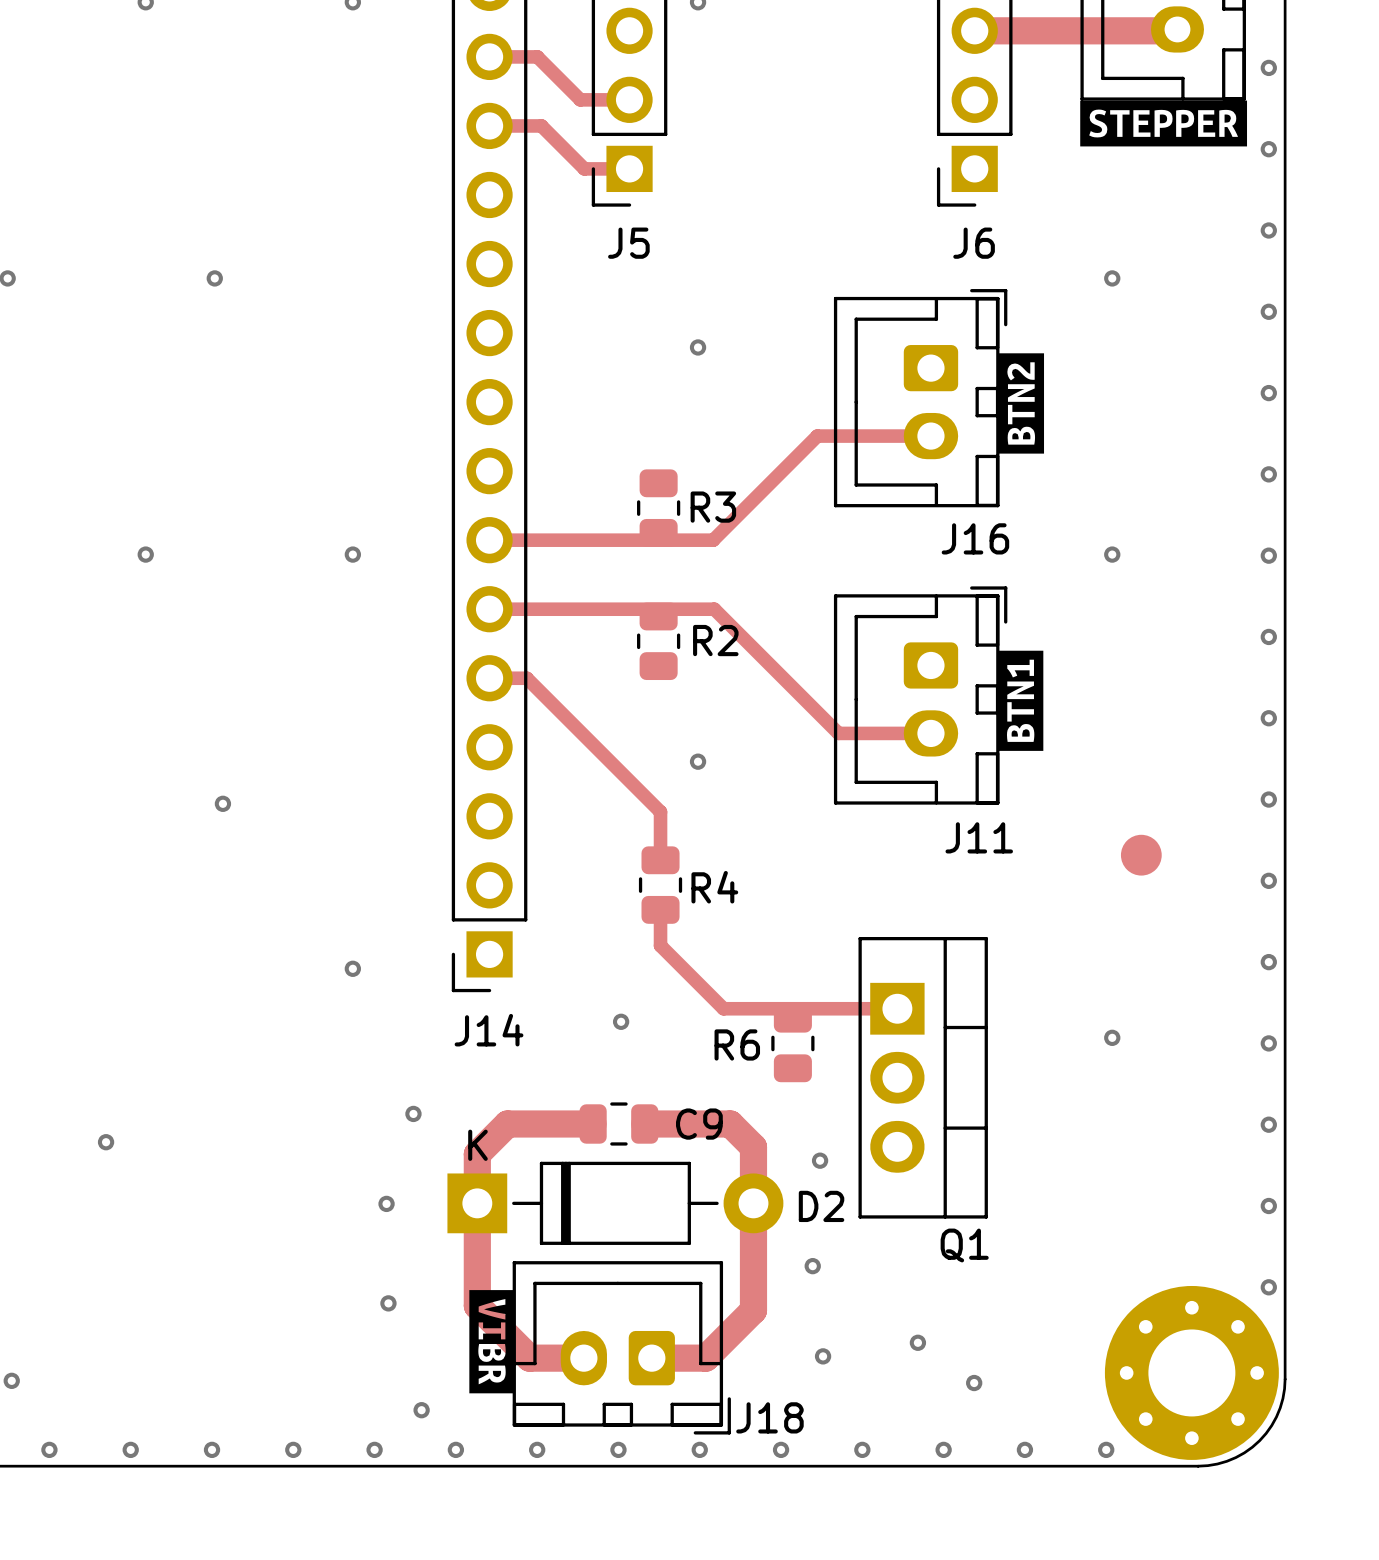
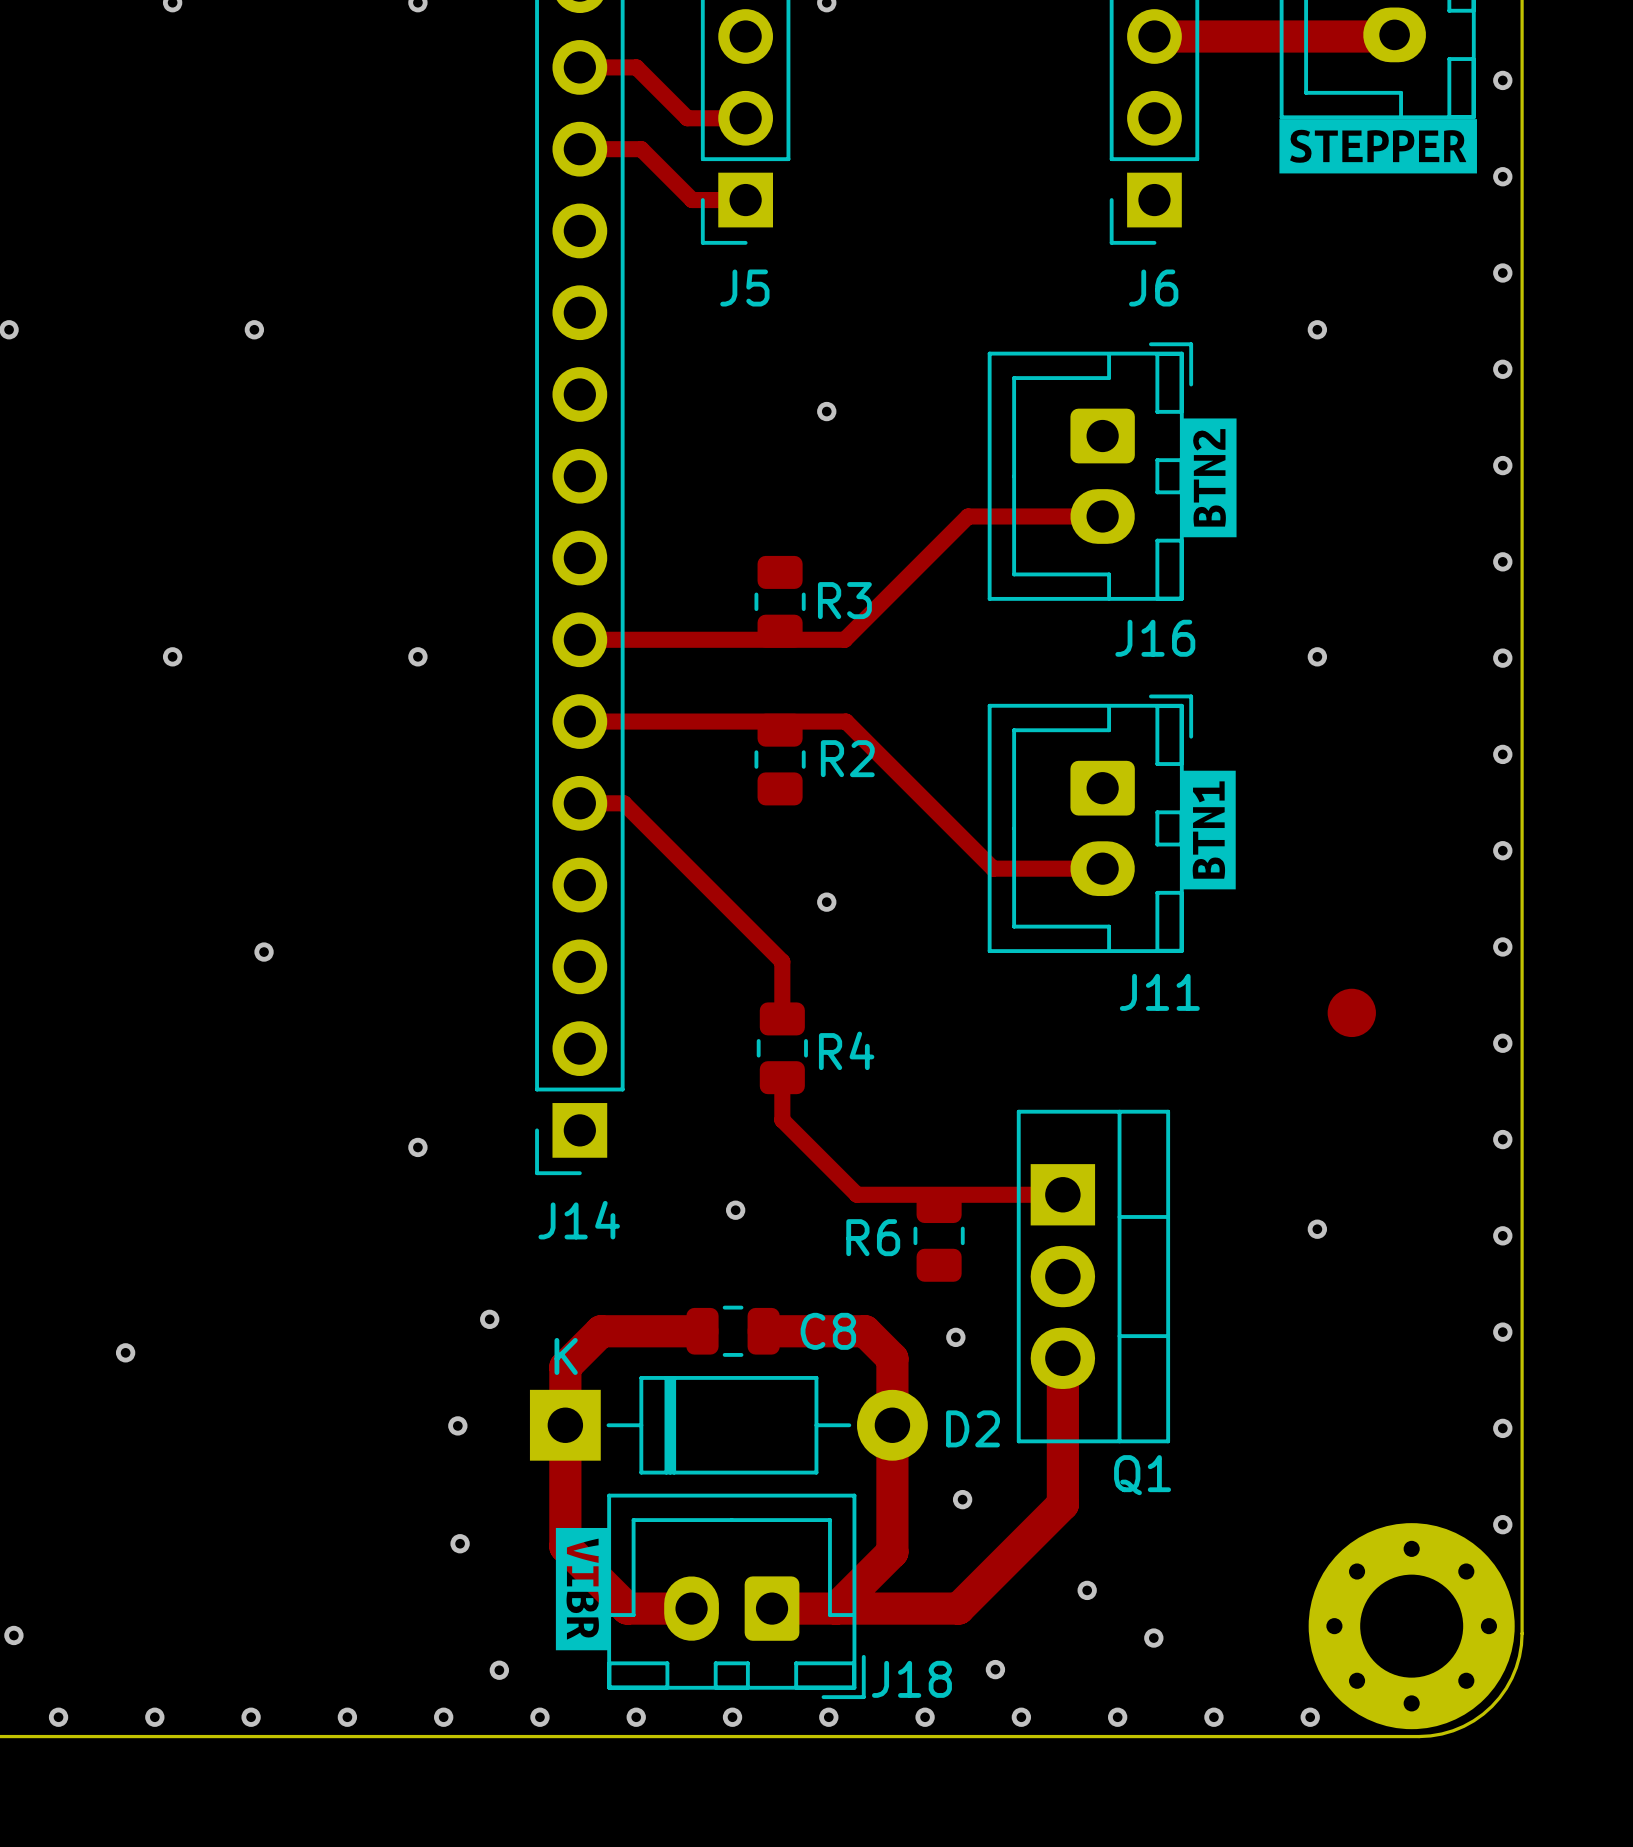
C9 name: C9 (699, 1124) -> C8 (828, 1331)
track: none -> (1062, 1358) (1062, 1504) (958, 1608) (835, 1608)
via position: (820, 1160) -> (955, 1337)
via position: (823, 1356) -> (995, 1669)

